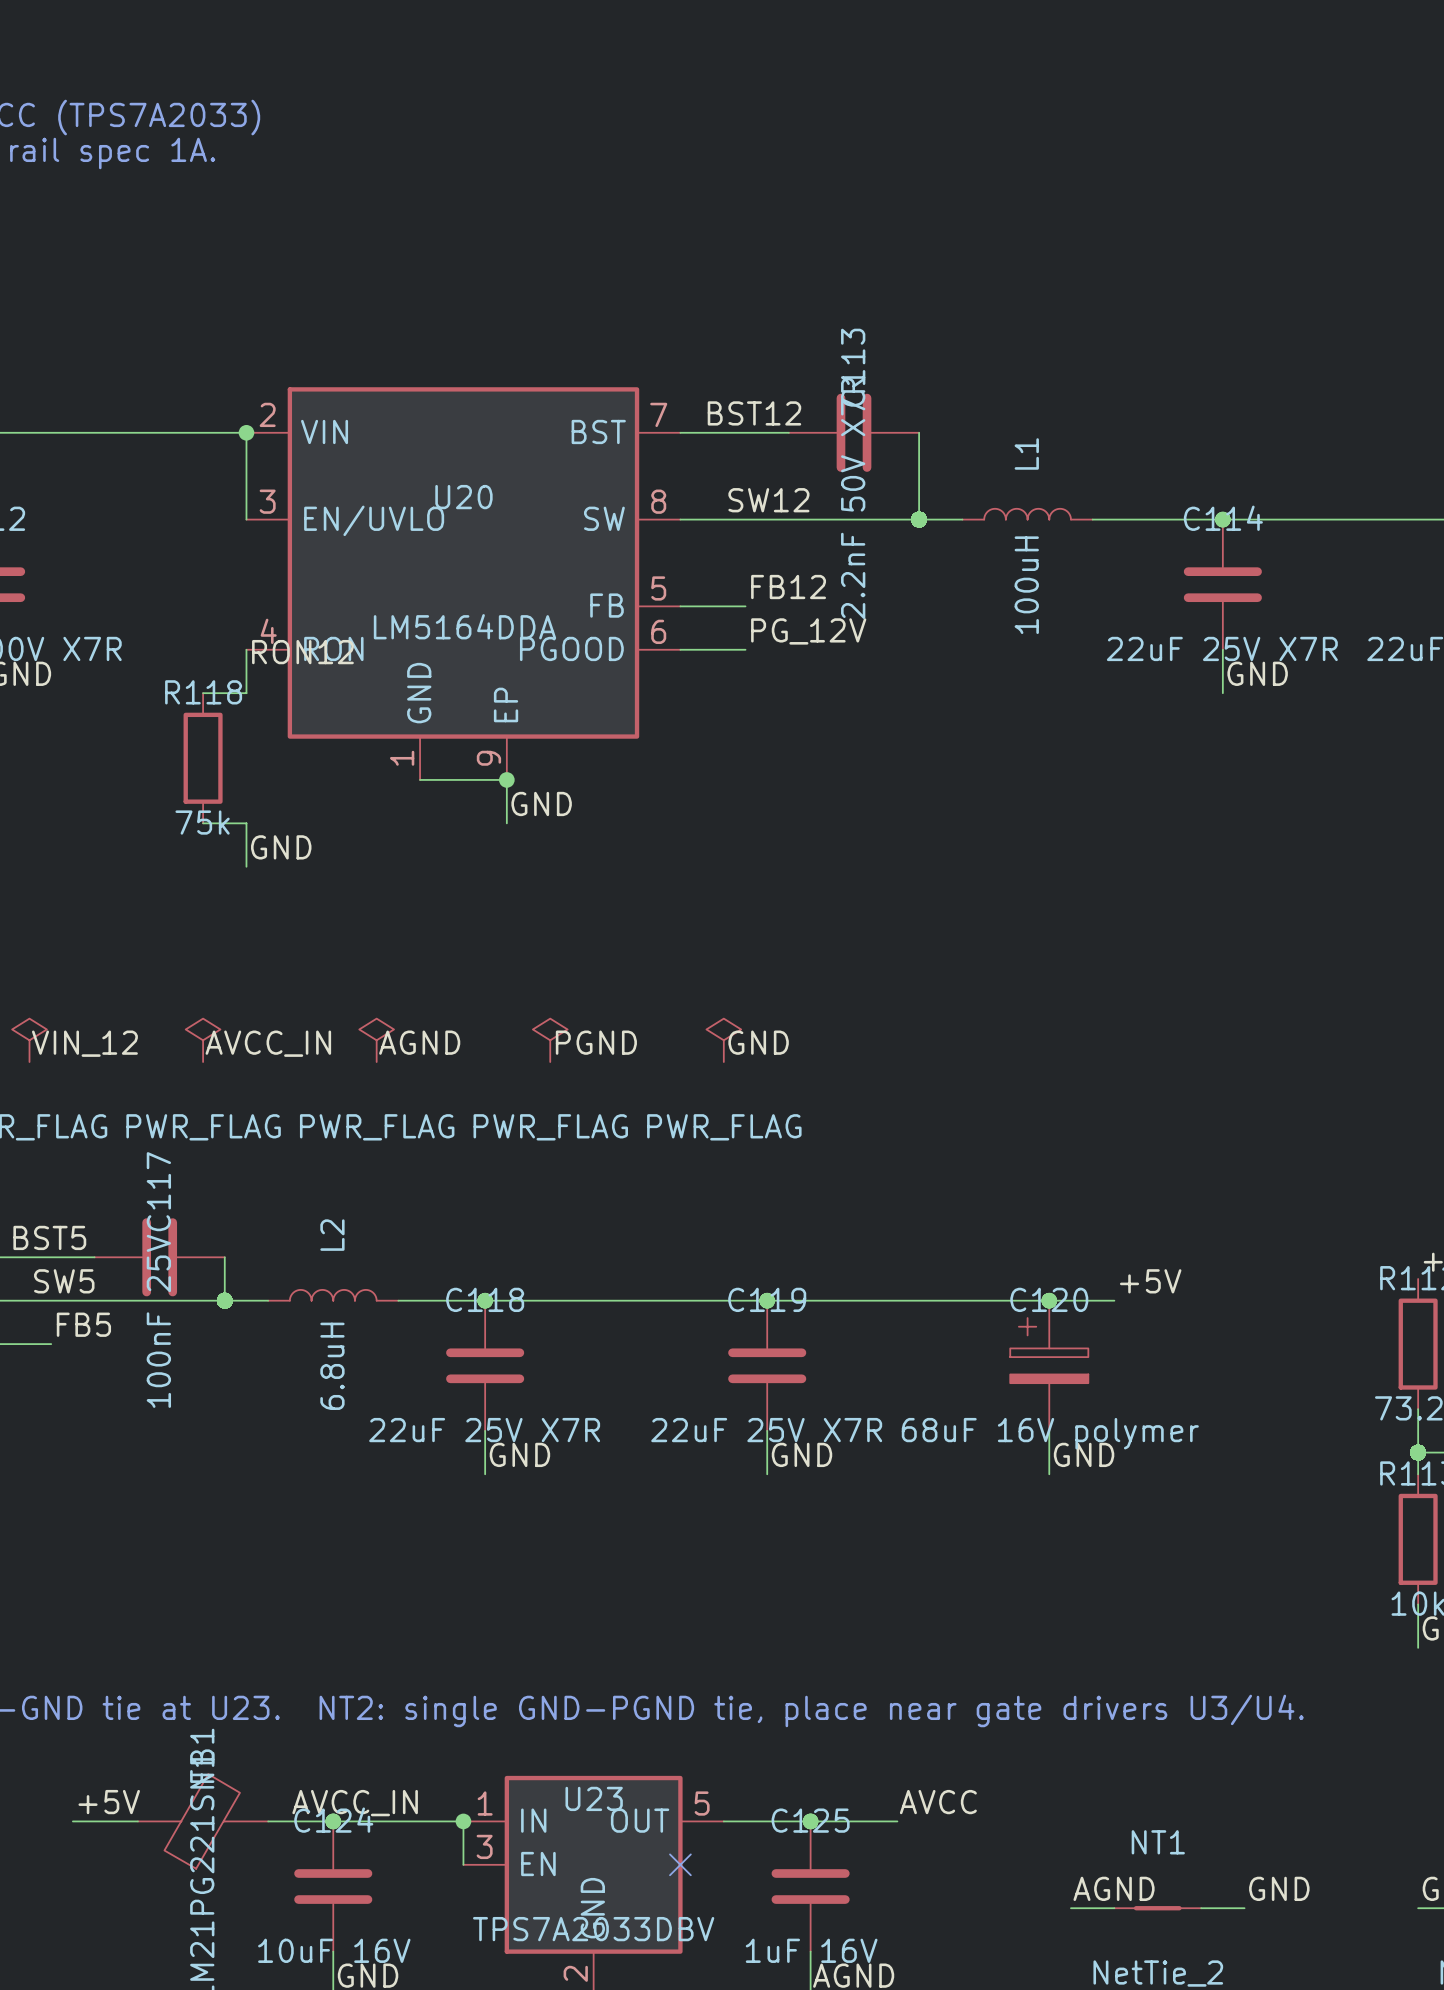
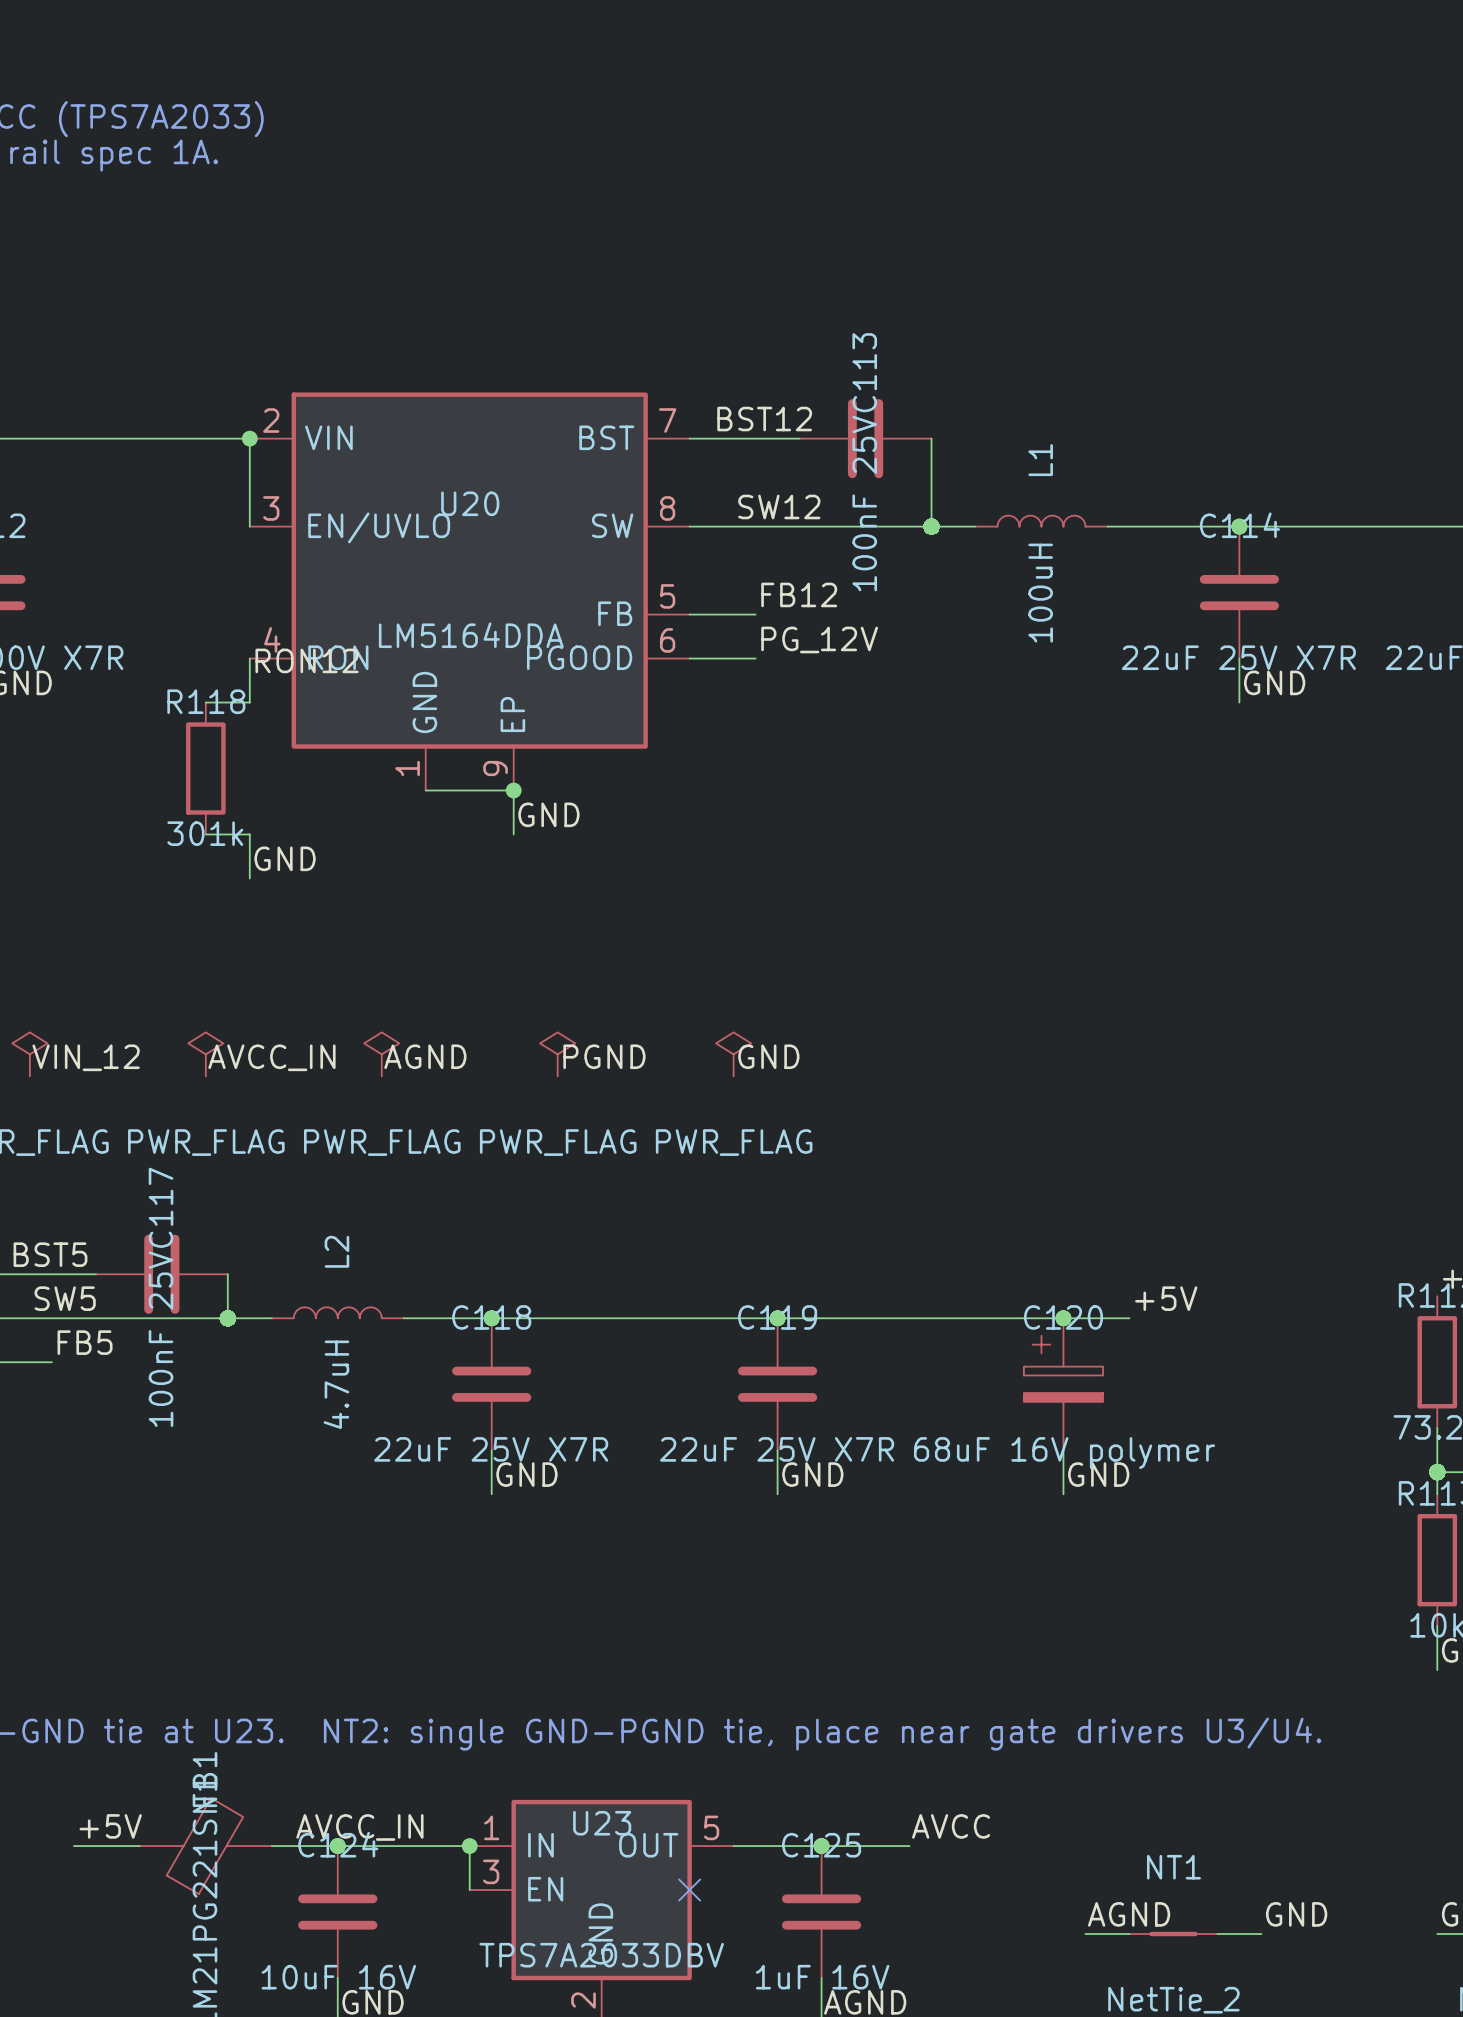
C113 value: 2.2nF 50V X7R (853, 498) -> 100nF 25V (864, 503)
R118 value: 75k (202, 822) -> 301k (205, 833)
L2 value: 6.8uH (332, 1366) -> 4.7uH (336, 1384)

